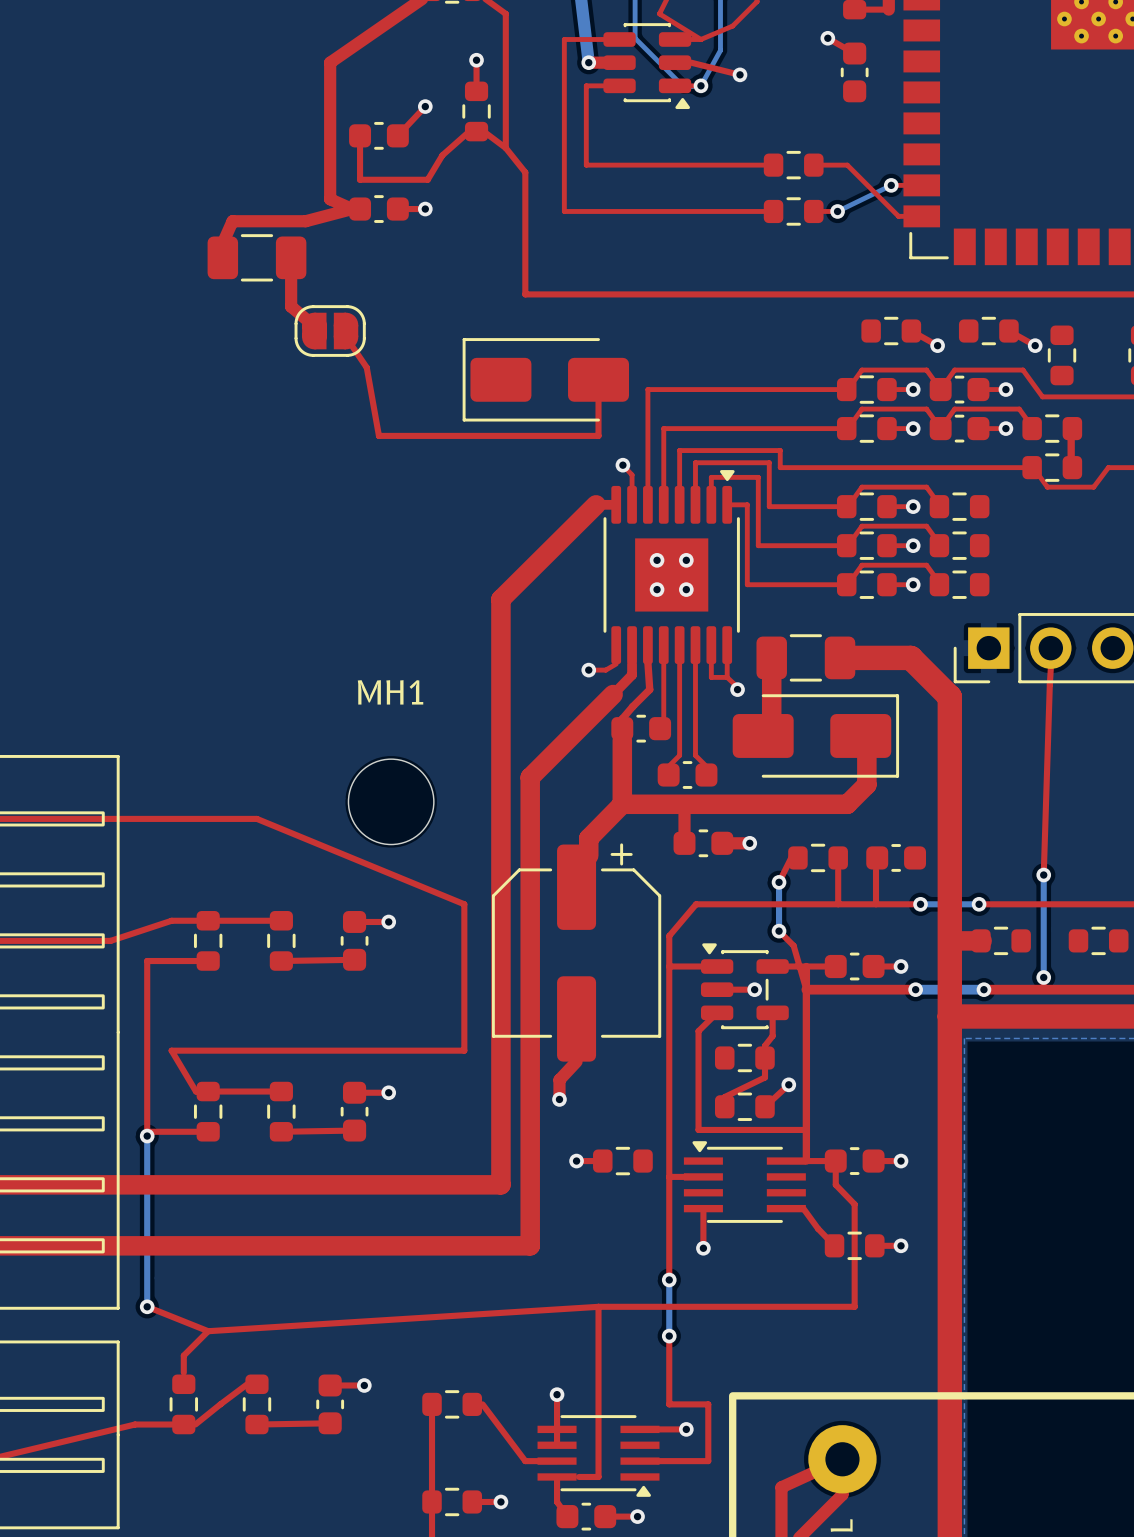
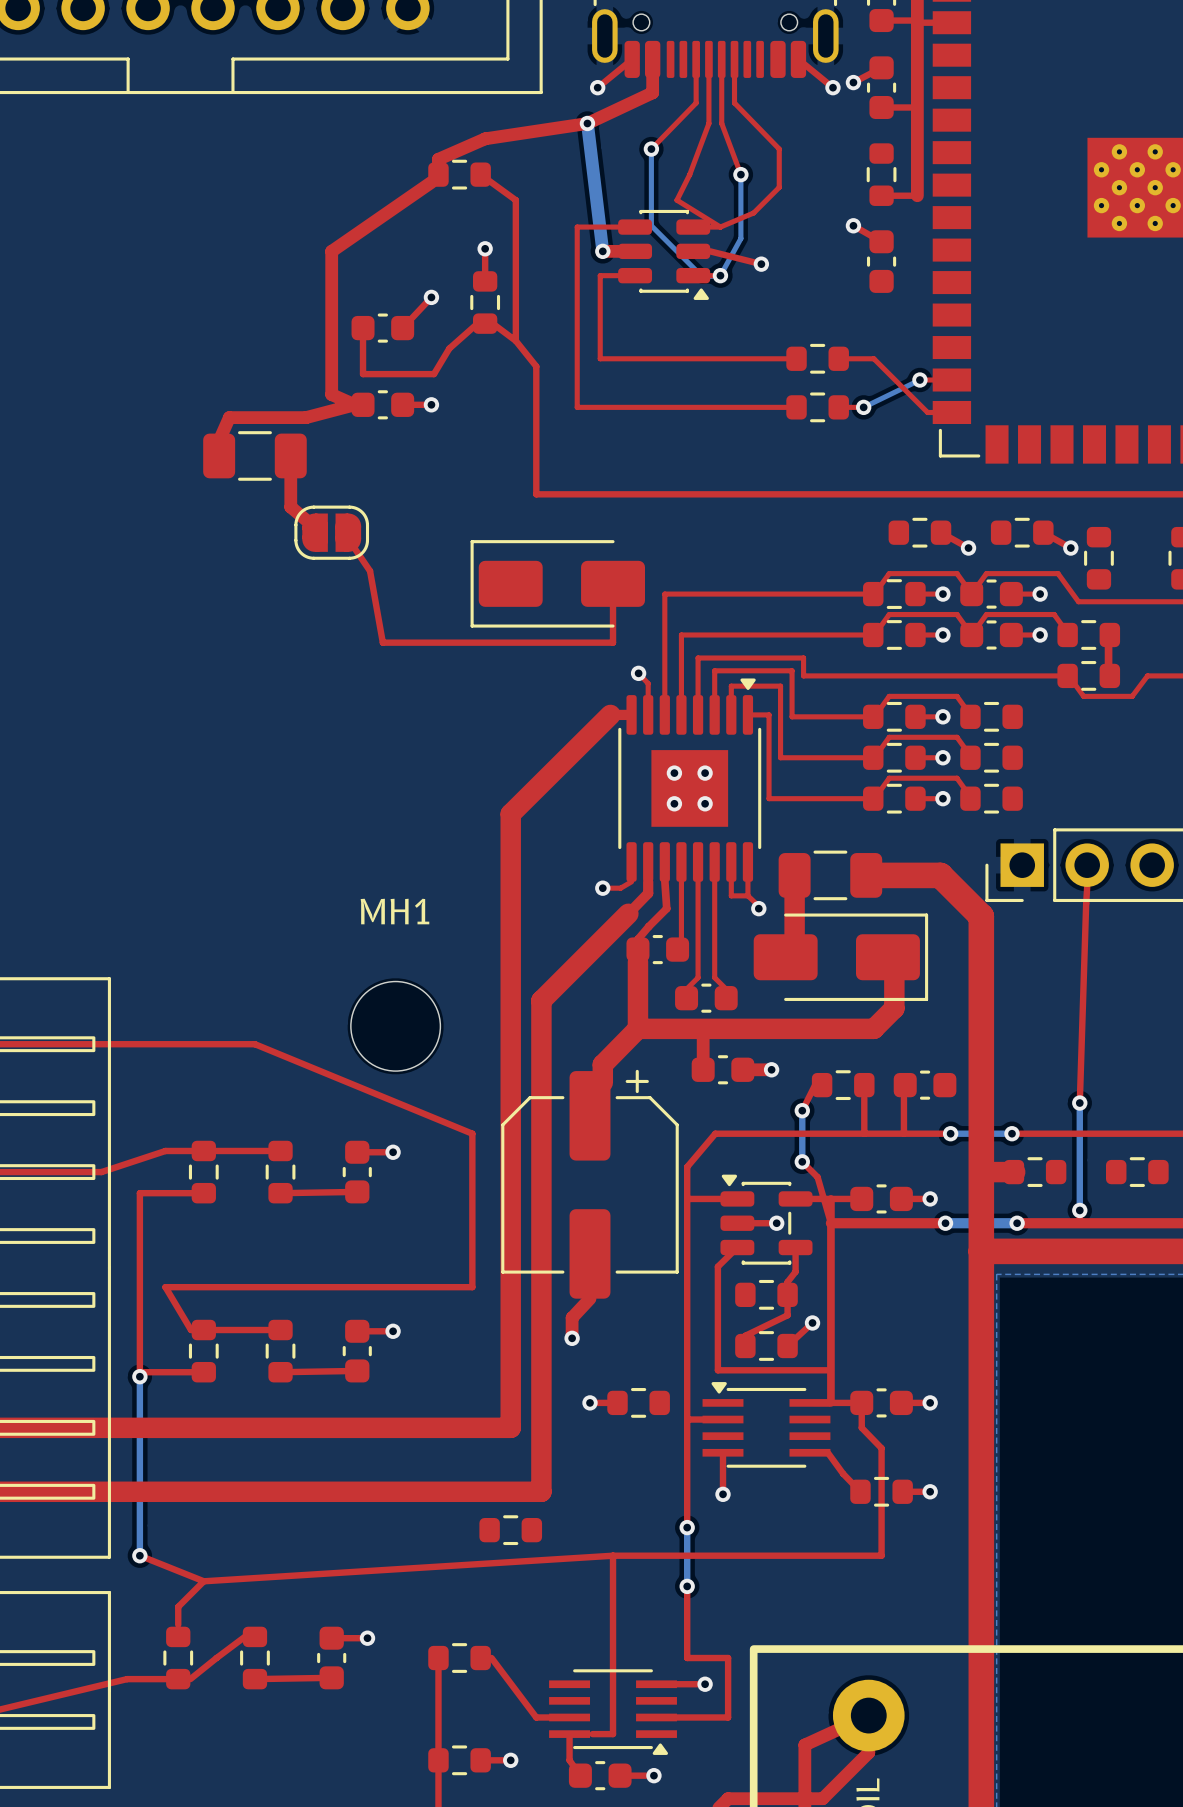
part: none -> (510, 1530)
top track: (557, 1394) (557, 1445) -> none
via: (557, 1394) -> none

